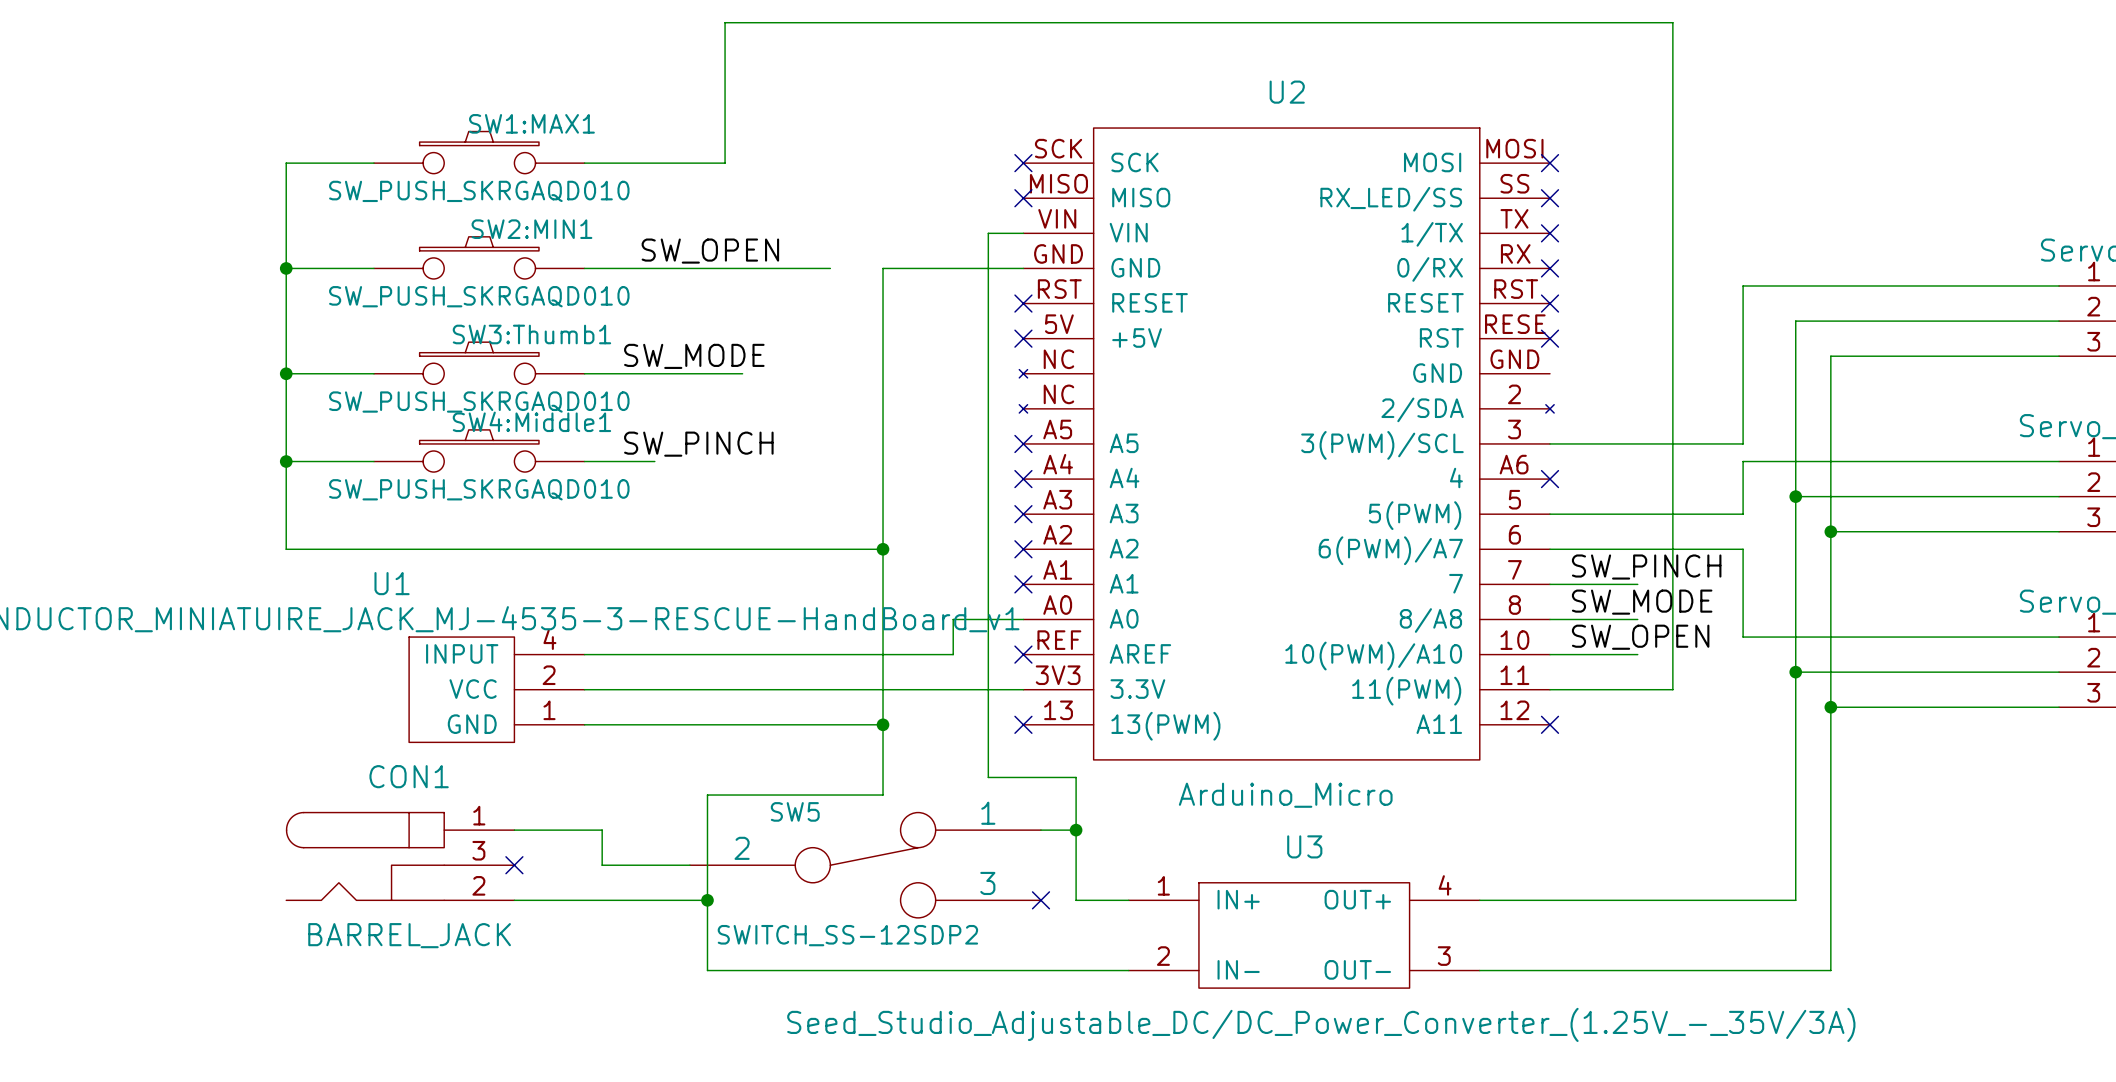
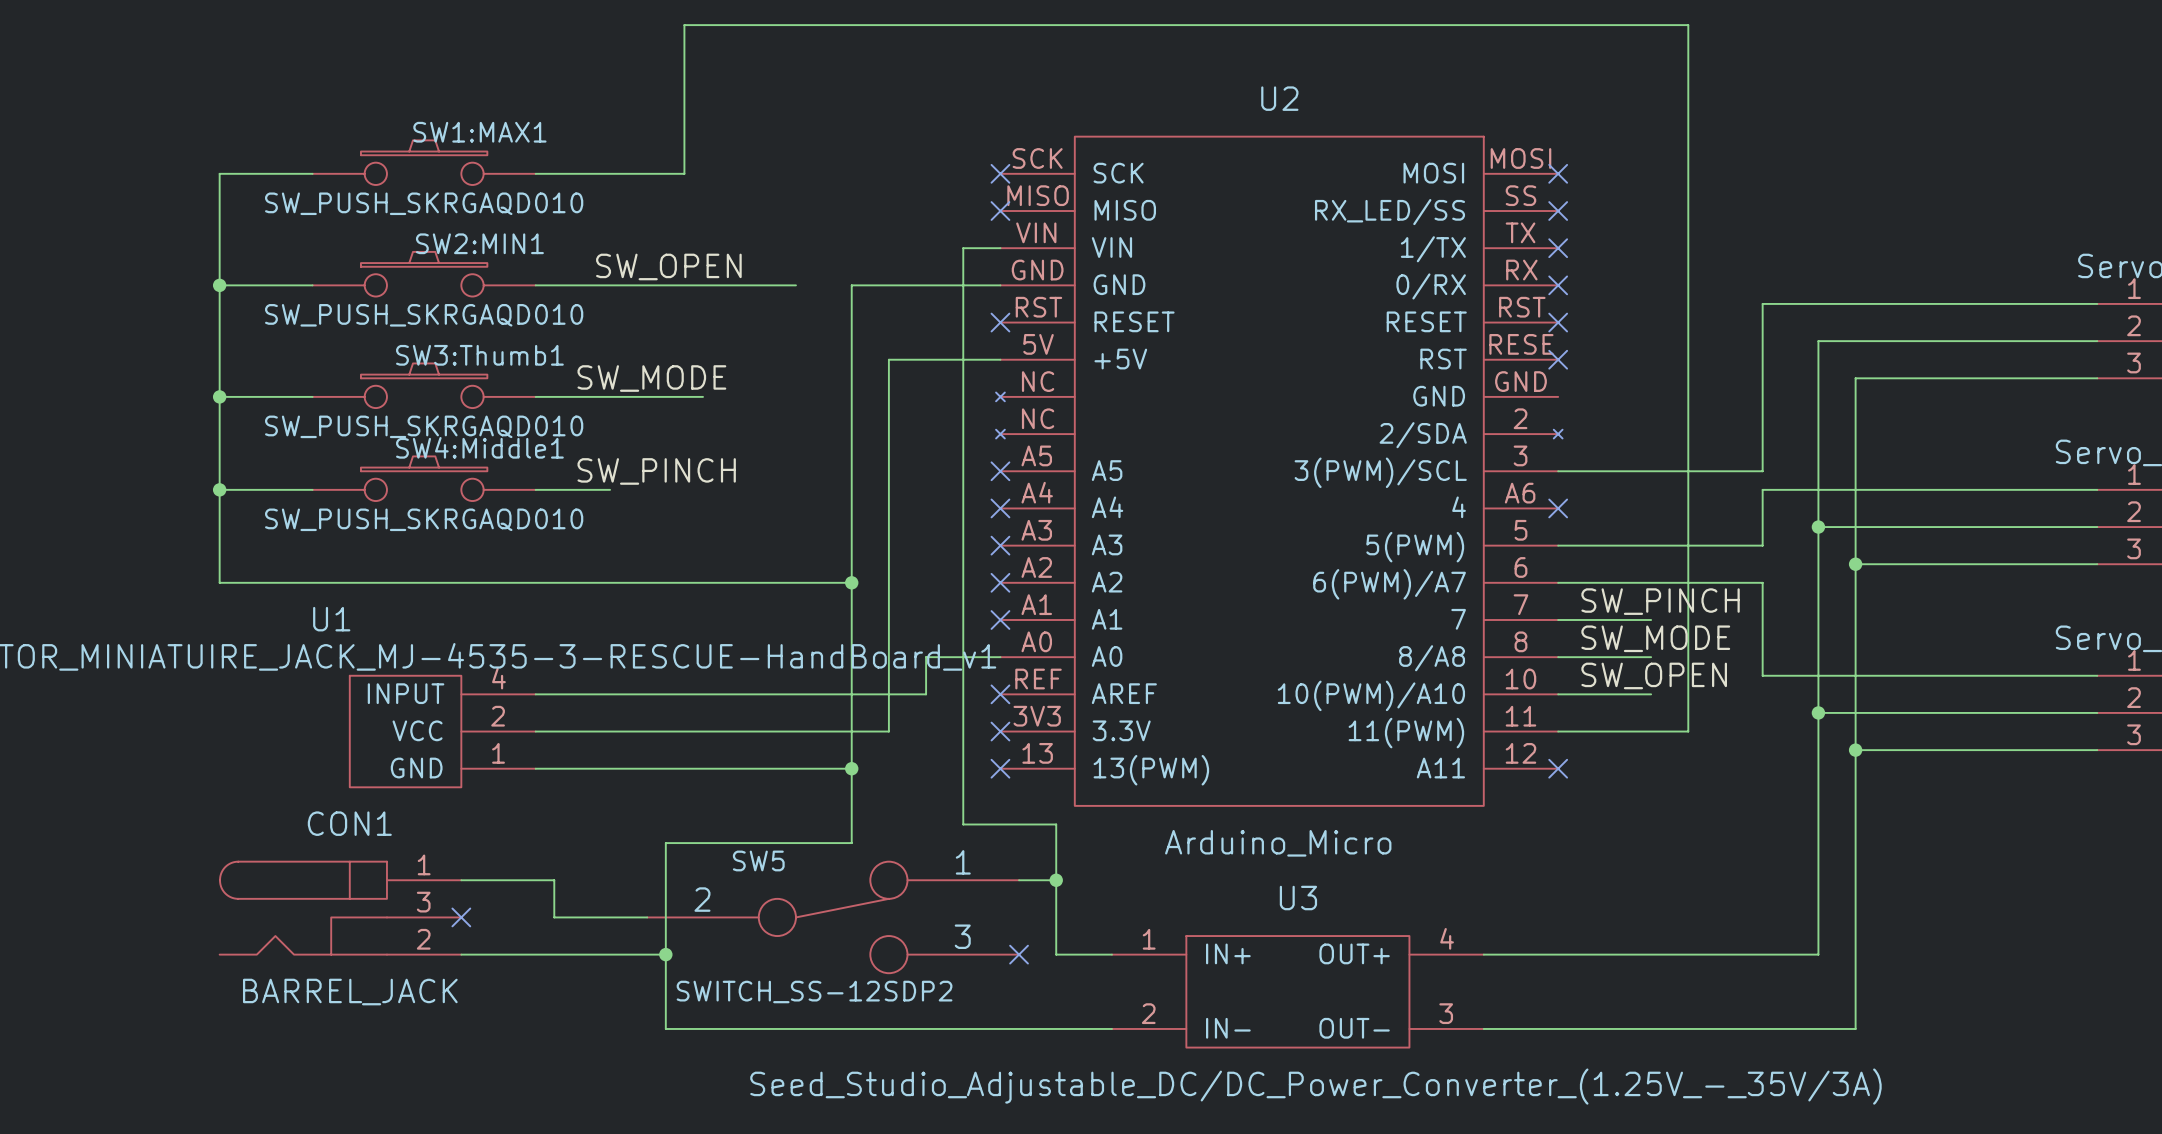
no-connect mark: (1023, 338) -> none
wire: (918, 689) (1023, 689) -> (888, 731) (888, 359) (1000, 359)
no-connect mark: none -> (1000, 731)

